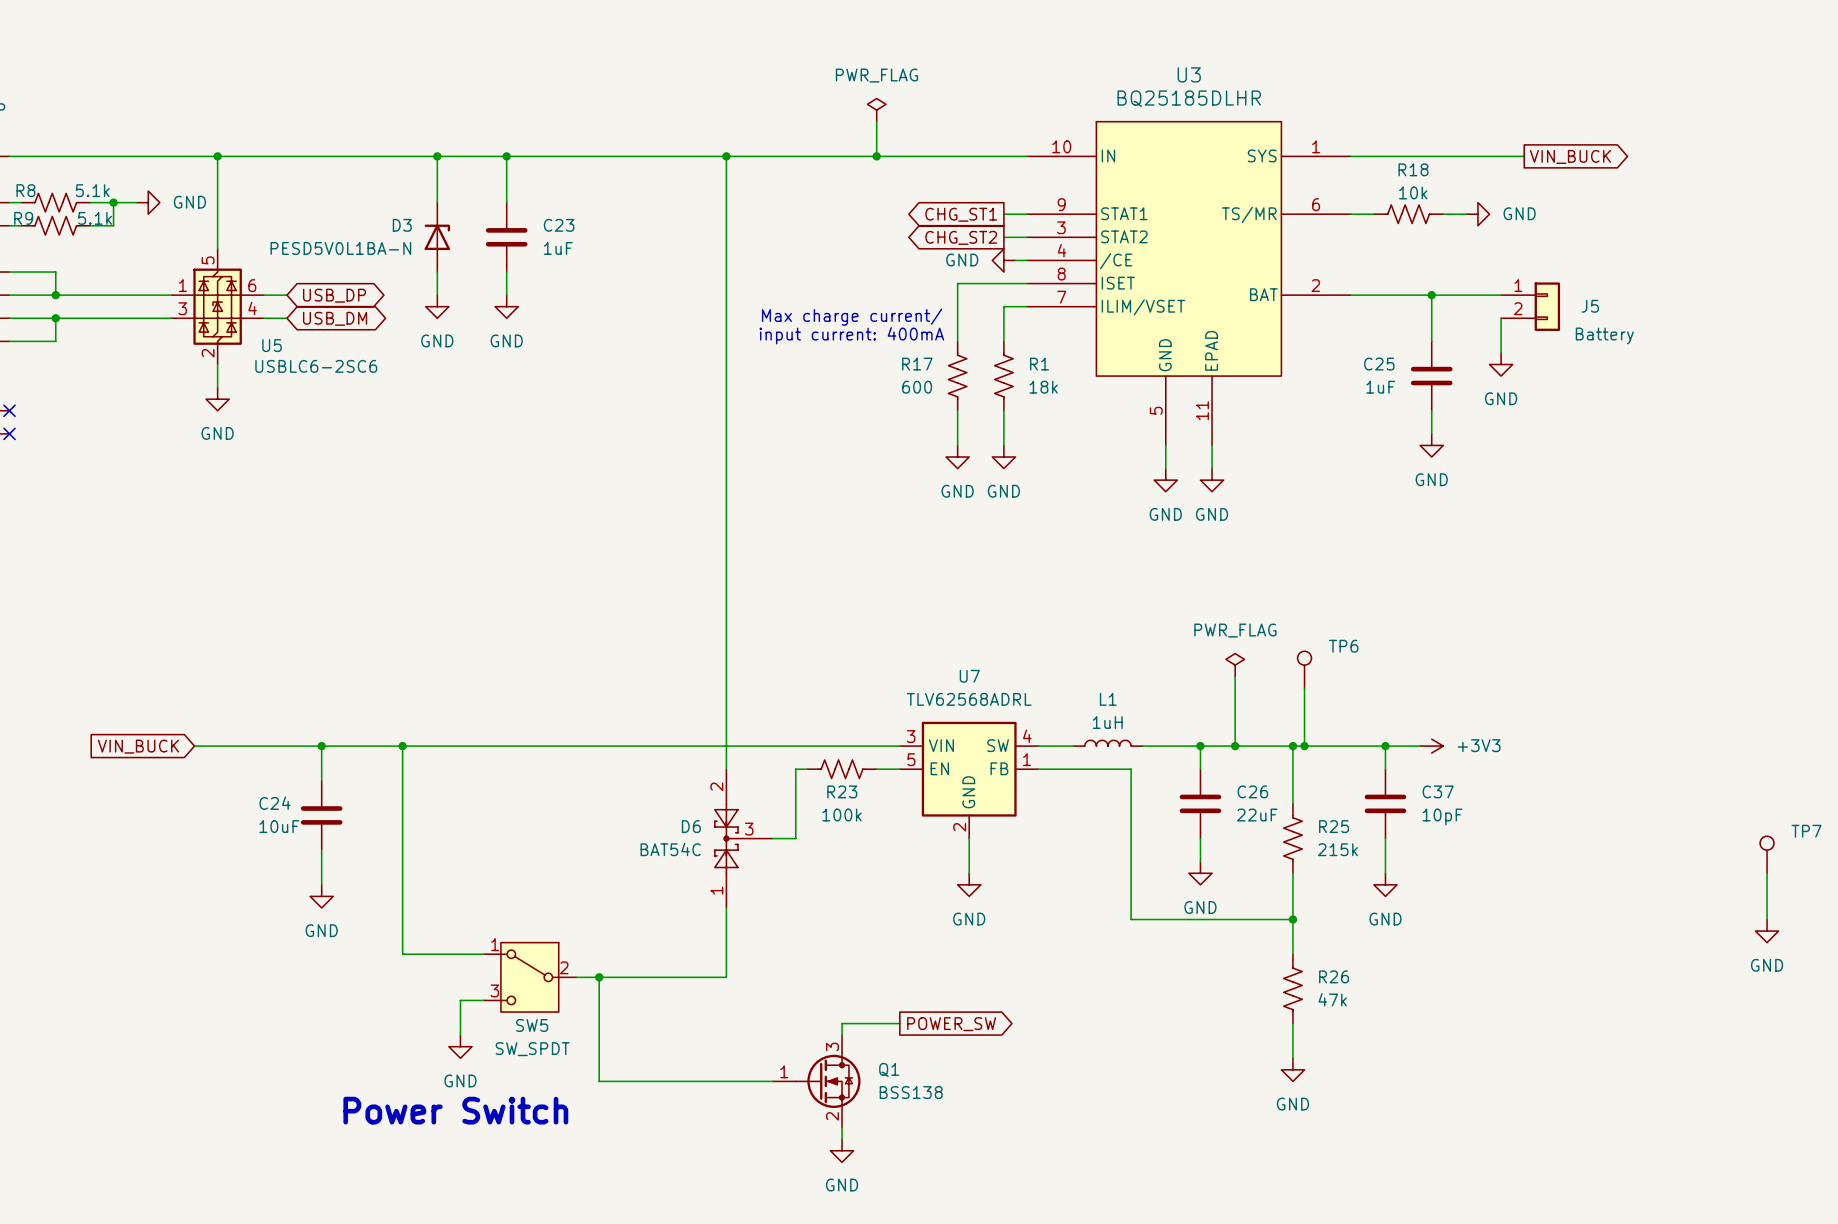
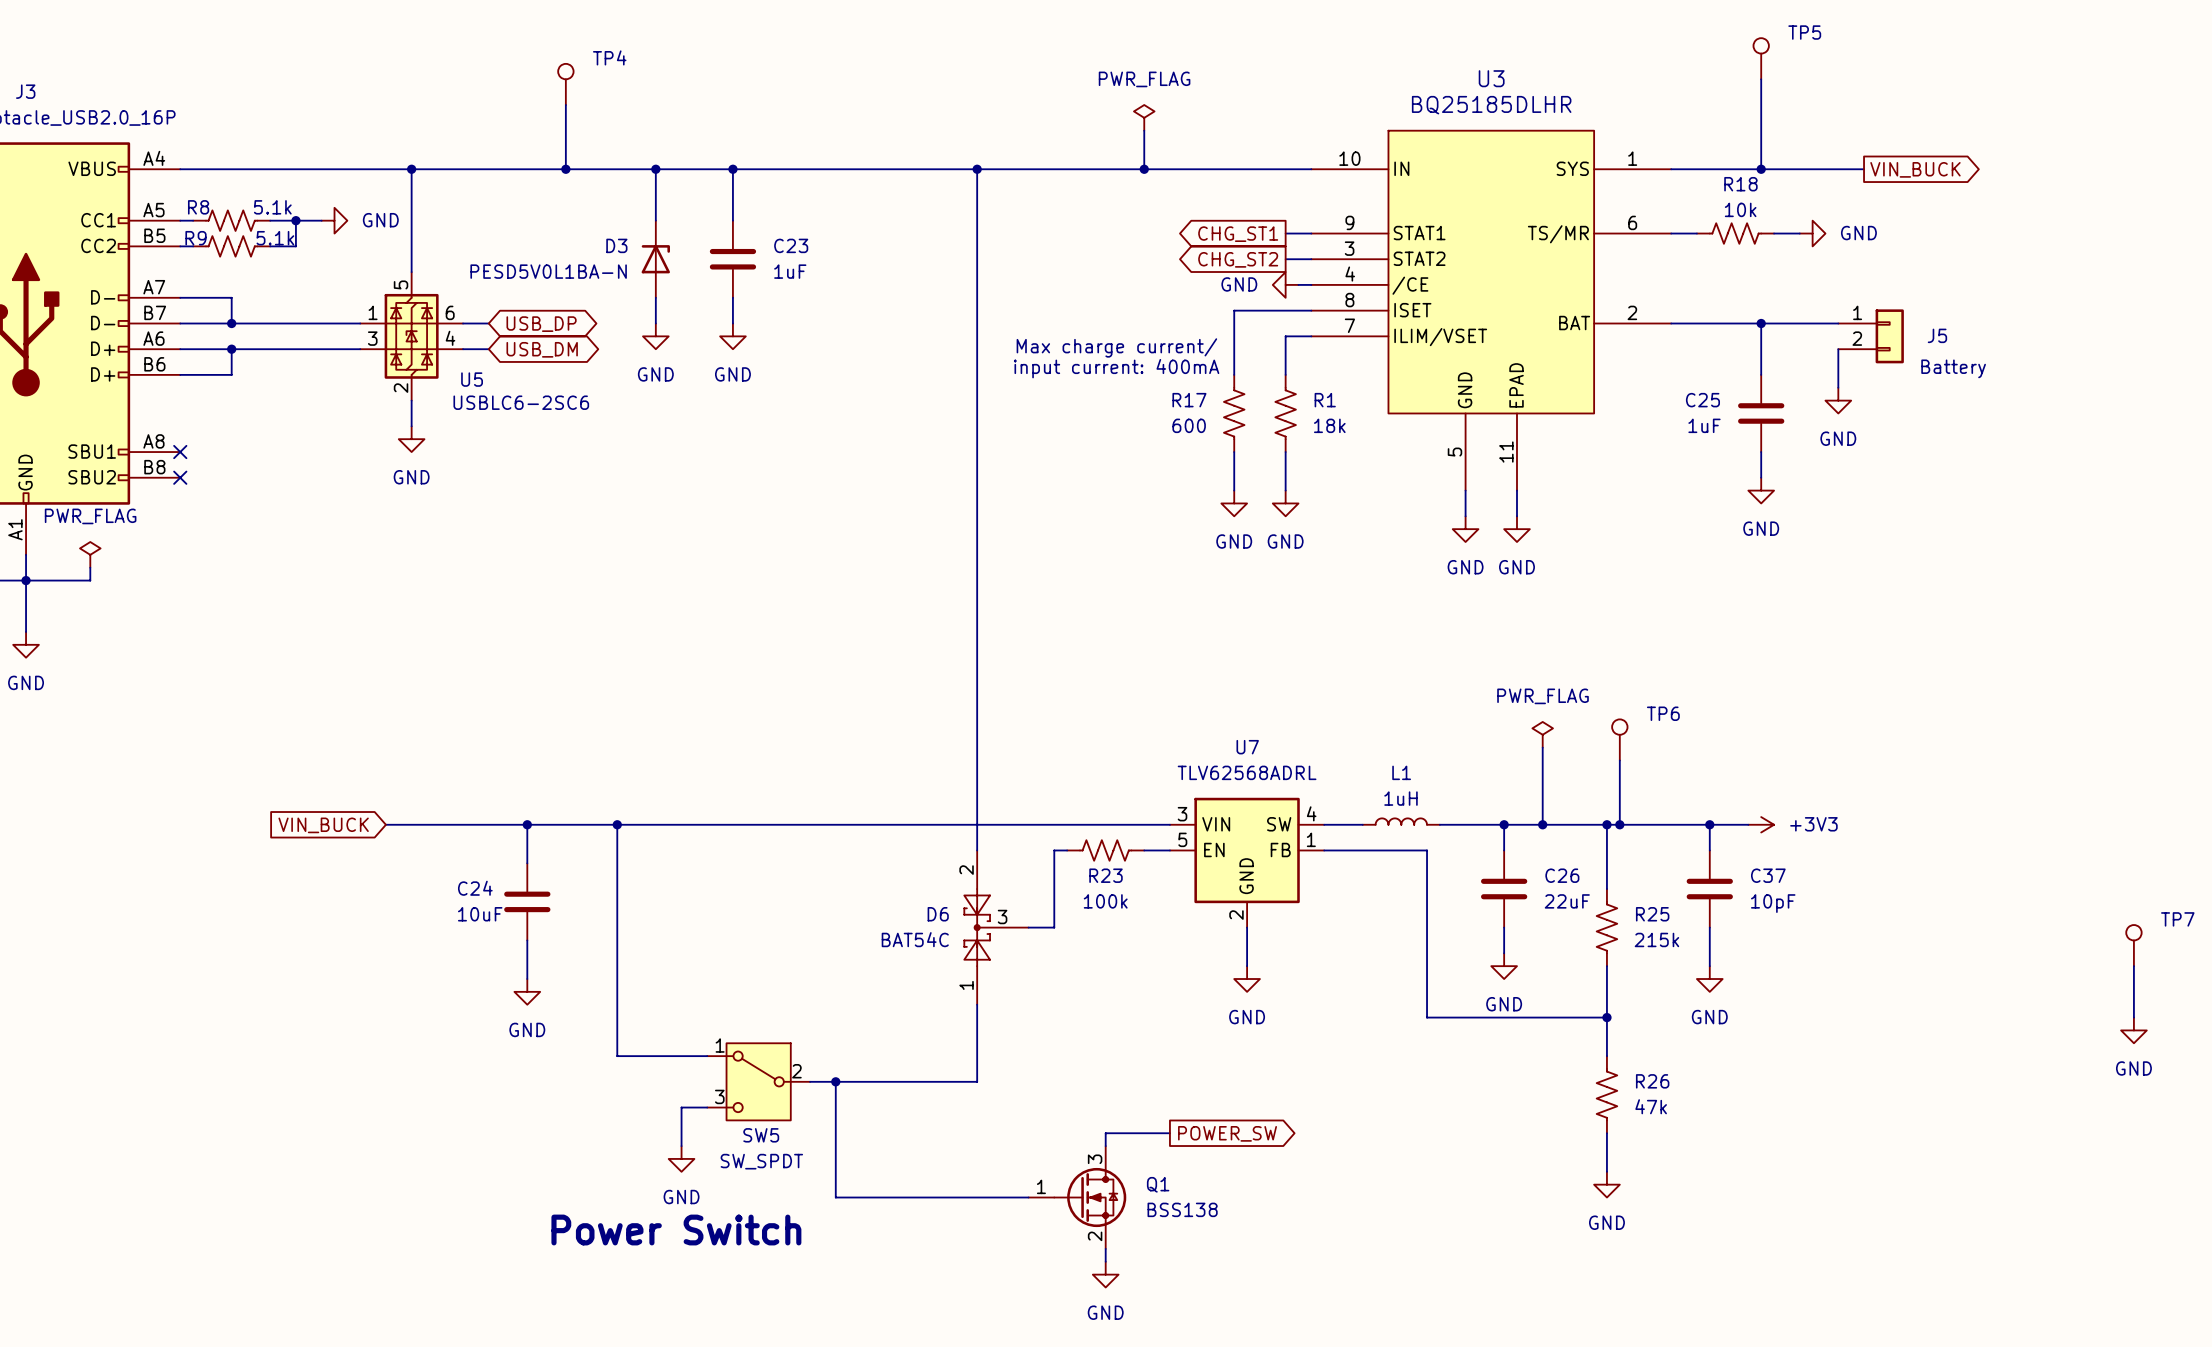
TP5: none -> (1761, 58)
wire: none -> (1761, 79) (1761, 169)
TP4: none -> (565, 84)
wire: none -> (565, 105) (565, 169)
junction: none -> (565, 169)
junction: none -> (1761, 169)

